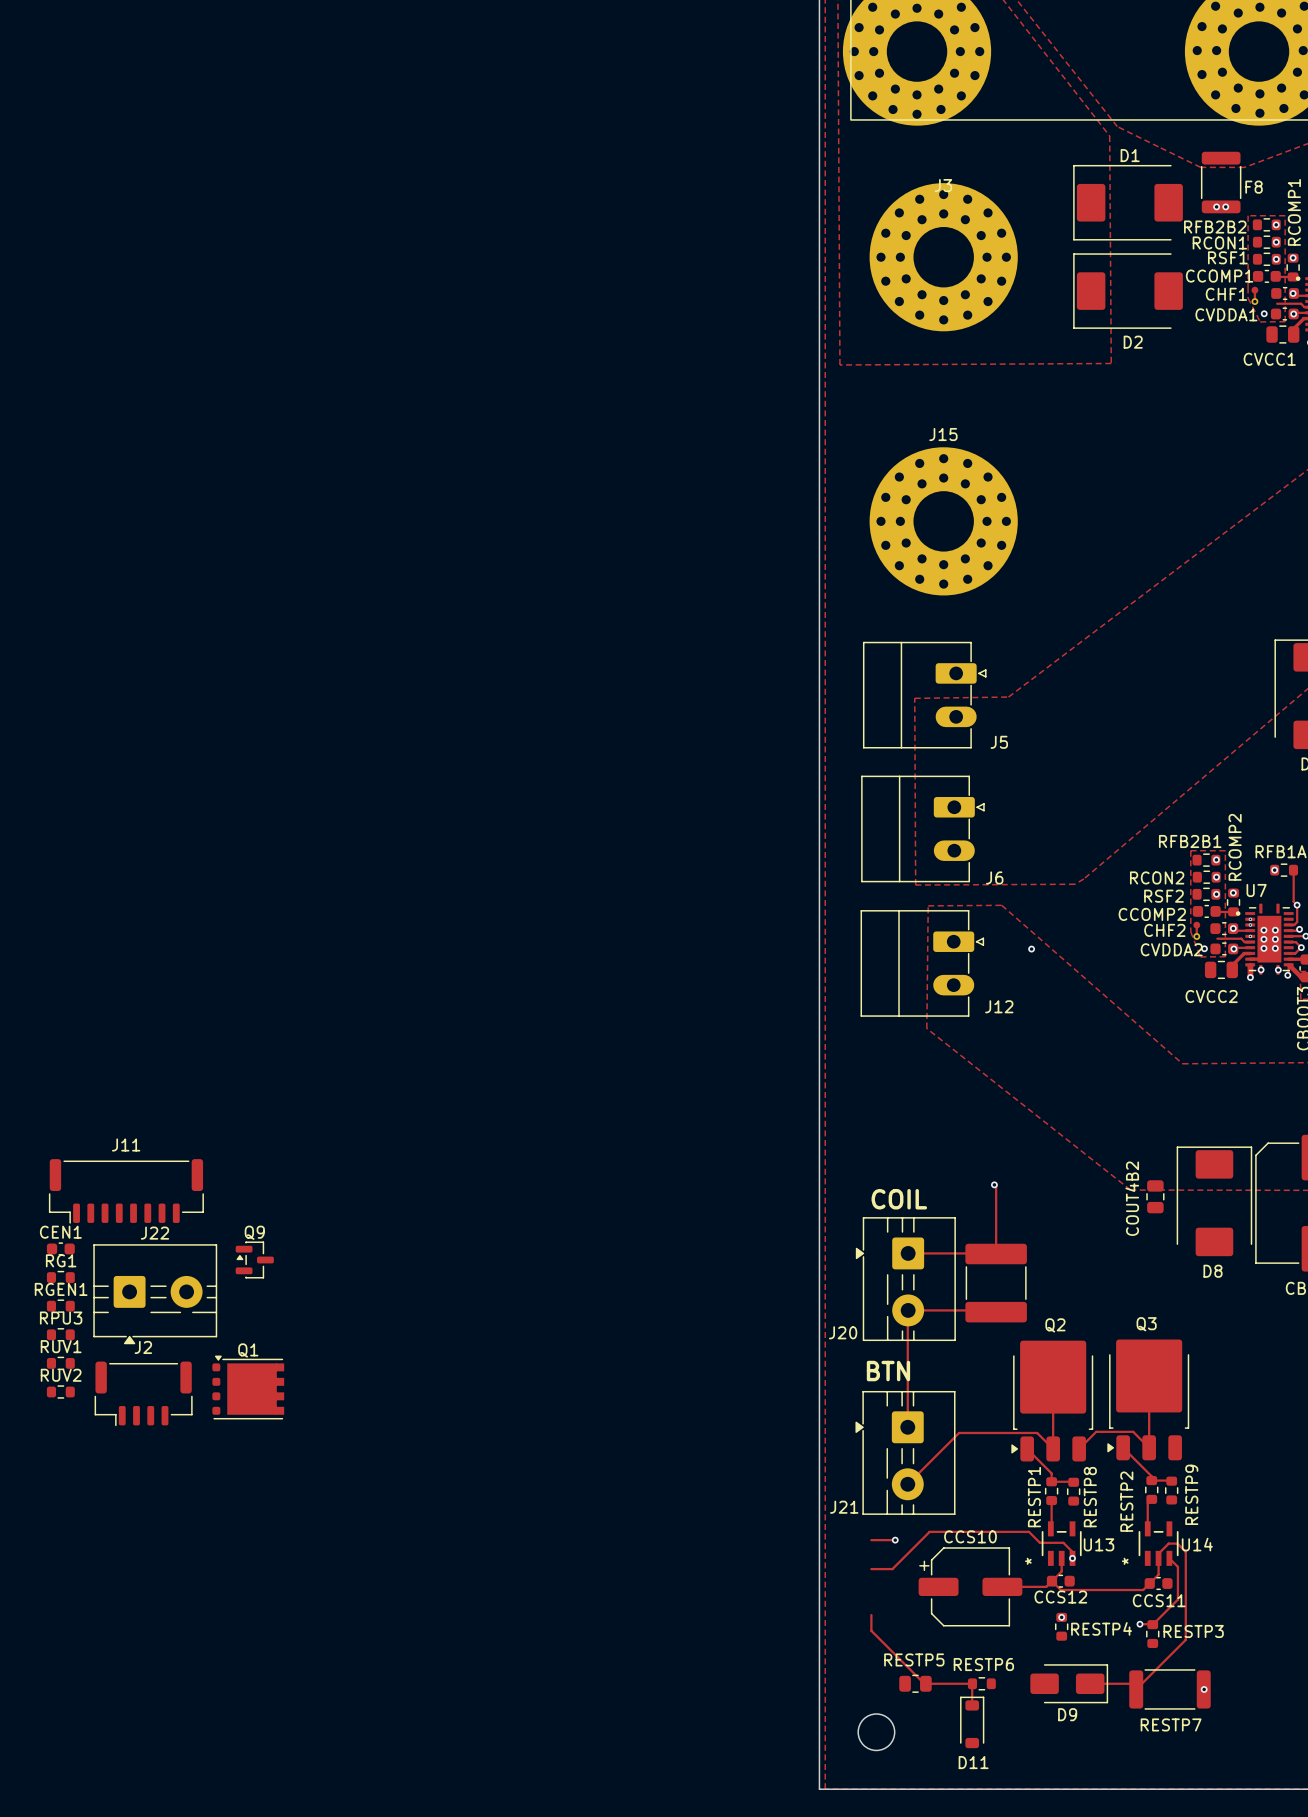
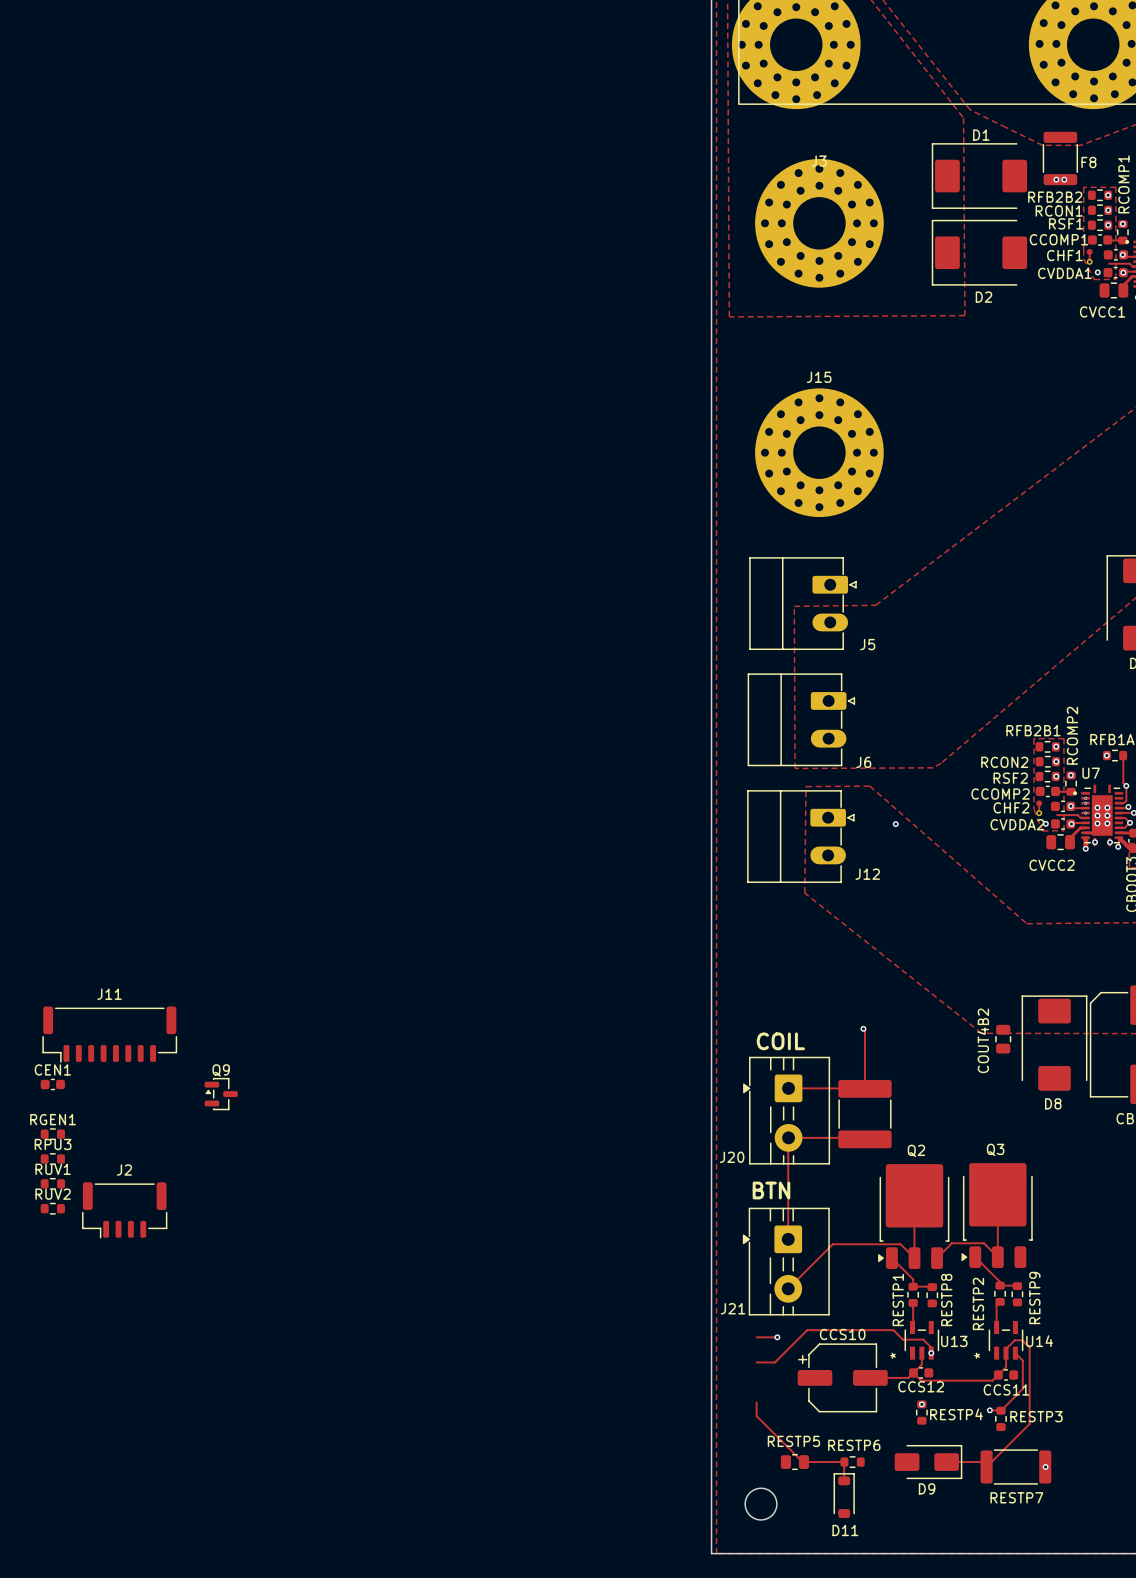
RG1: (60, 1277) -> none
J22: (155, 1294) -> none
Q1: (248, 1387) -> none

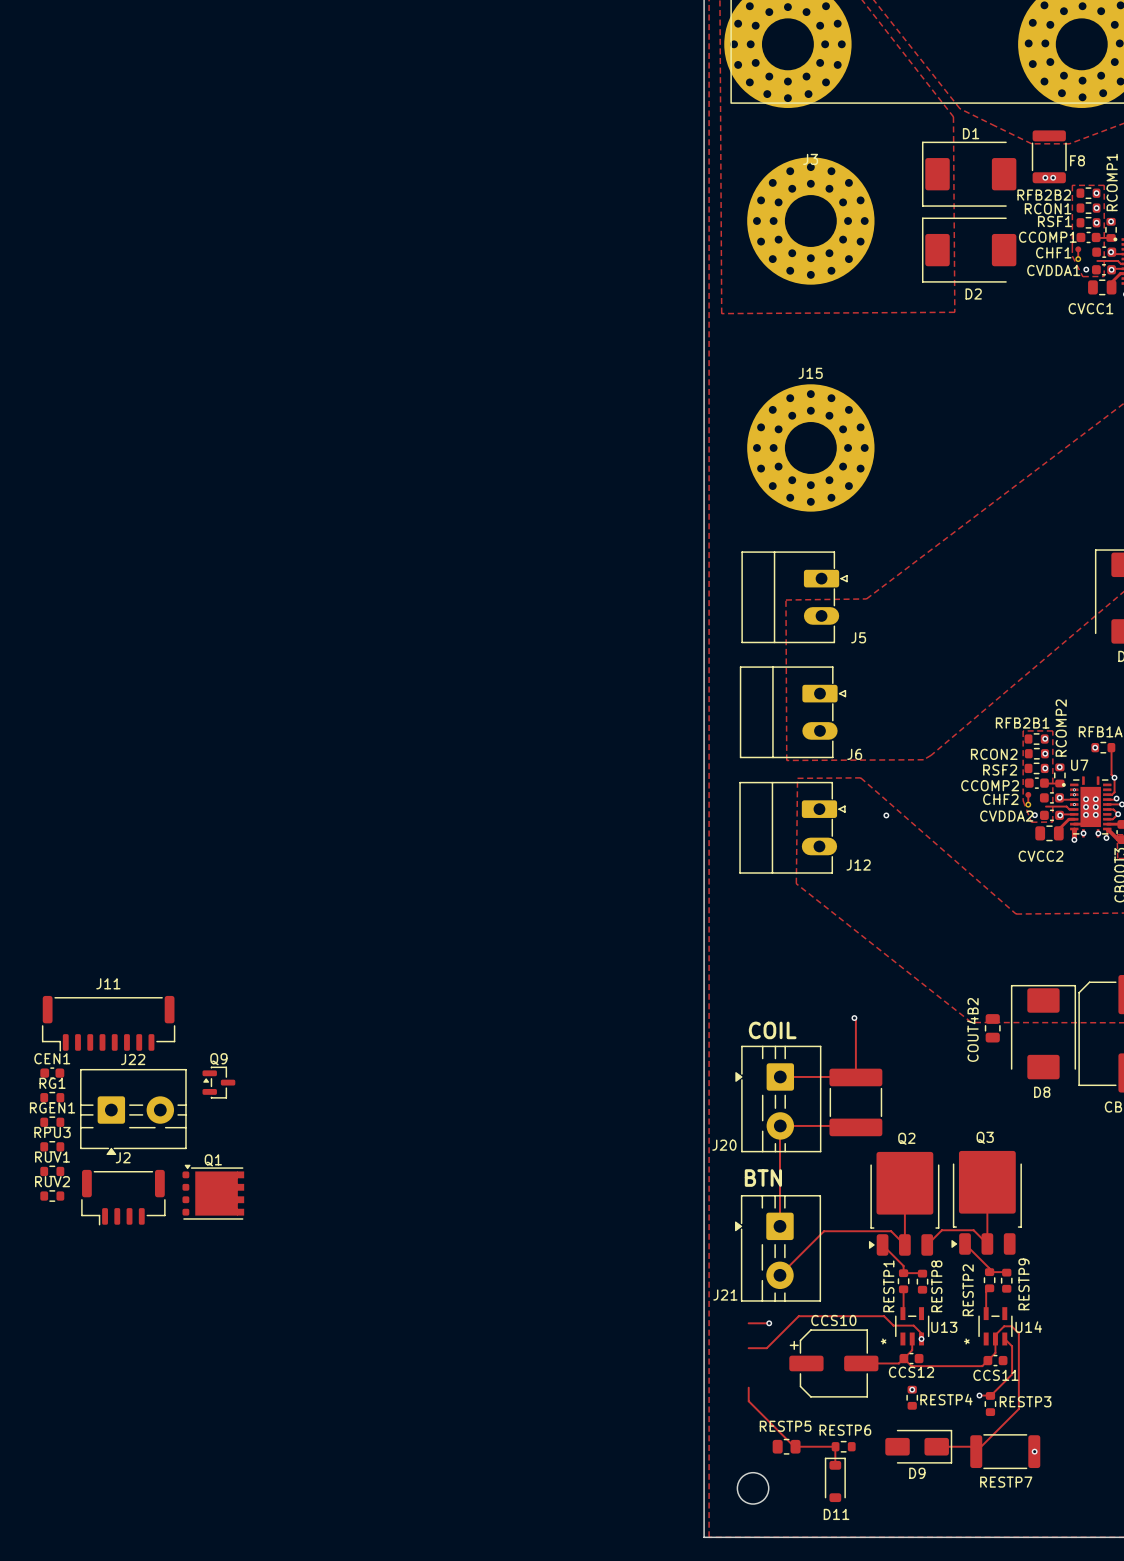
RG1: none -> (52, 1097)
J22: none -> (133, 1112)
Q1: none -> (213, 1192)

